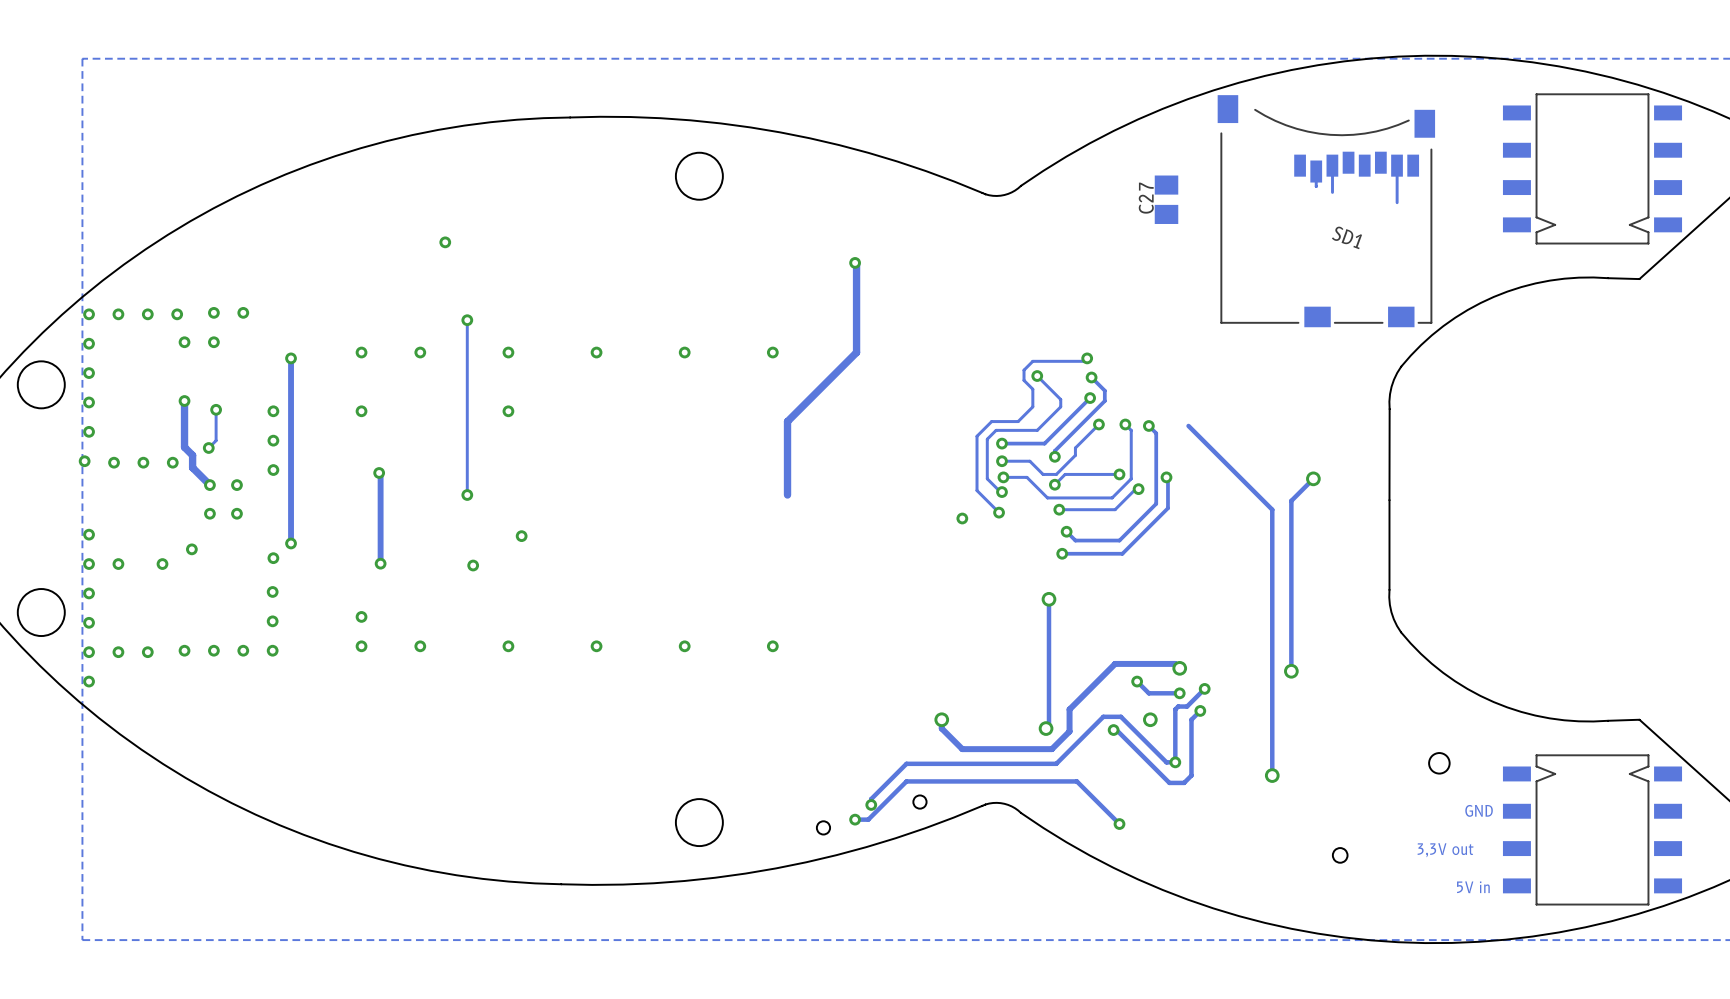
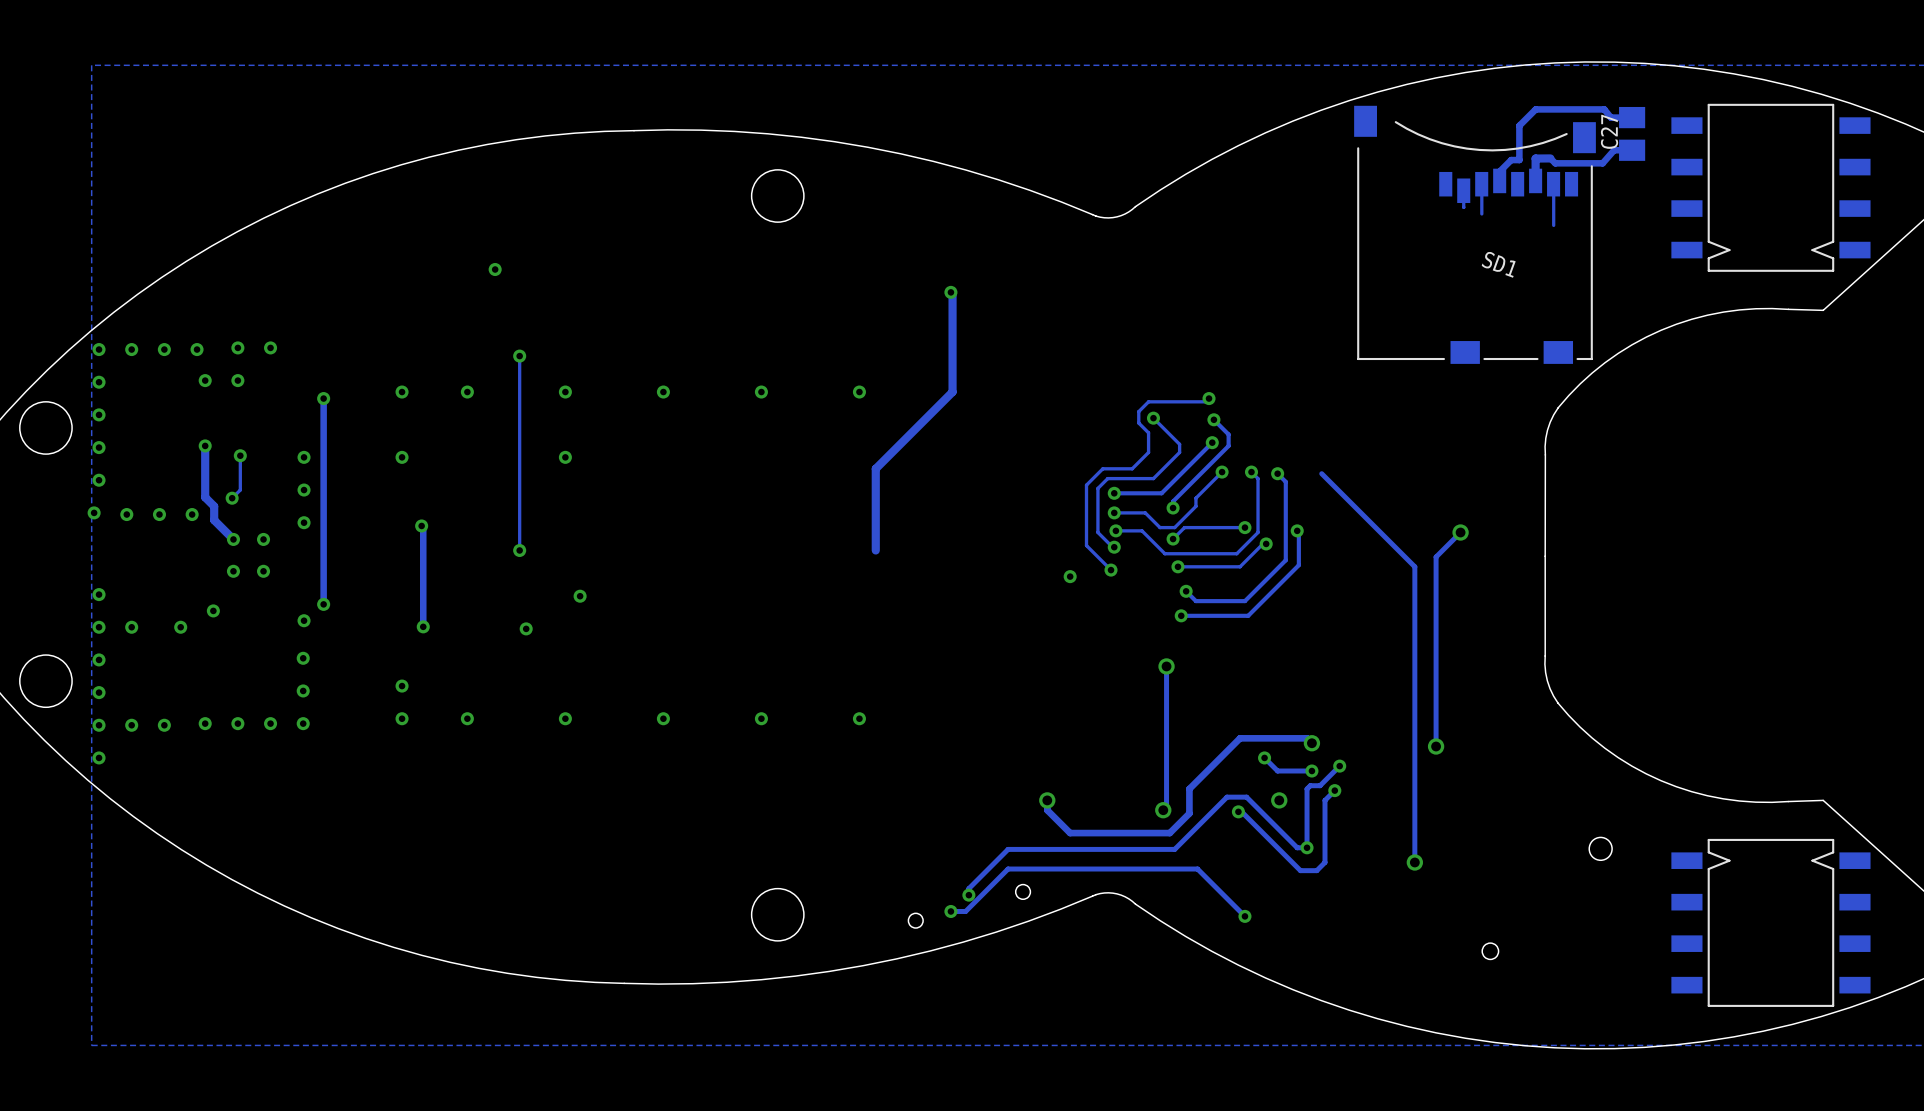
track: none -> (1632, 117) (1610, 117) (1604, 109) (1535, 109) (1519, 125) (1519, 160) (1511, 160) (1499, 171) (1499, 180)
track: none -> (1632, 150) (1614, 150) (1602, 163) (1555, 163) (1550, 158) (1535, 158) (1535, 180)
C27 position: (1166, 199) -> (1632, 133)
text: GND (1479, 810) -> none
text: 3,3V out (1445, 850) -> none
text: 5V in (1473, 887) -> none

